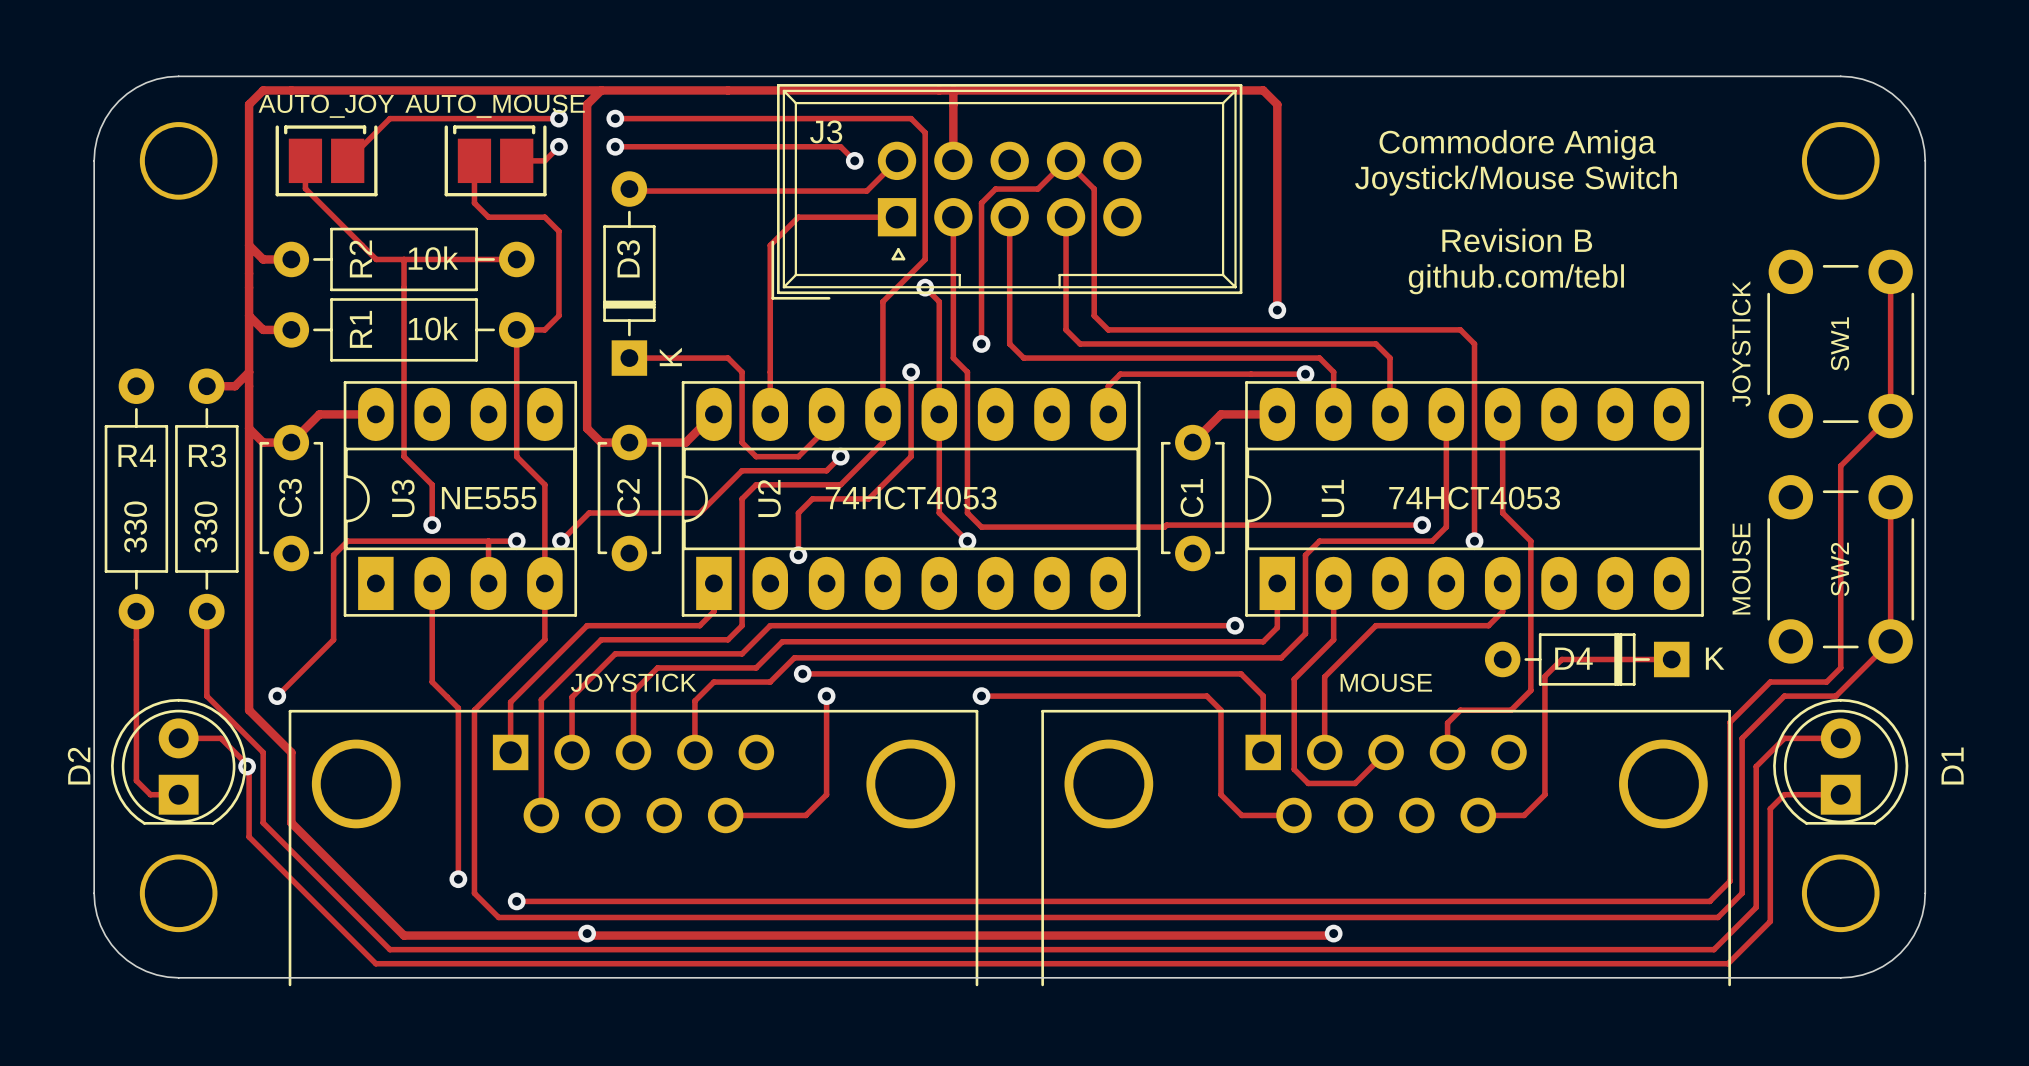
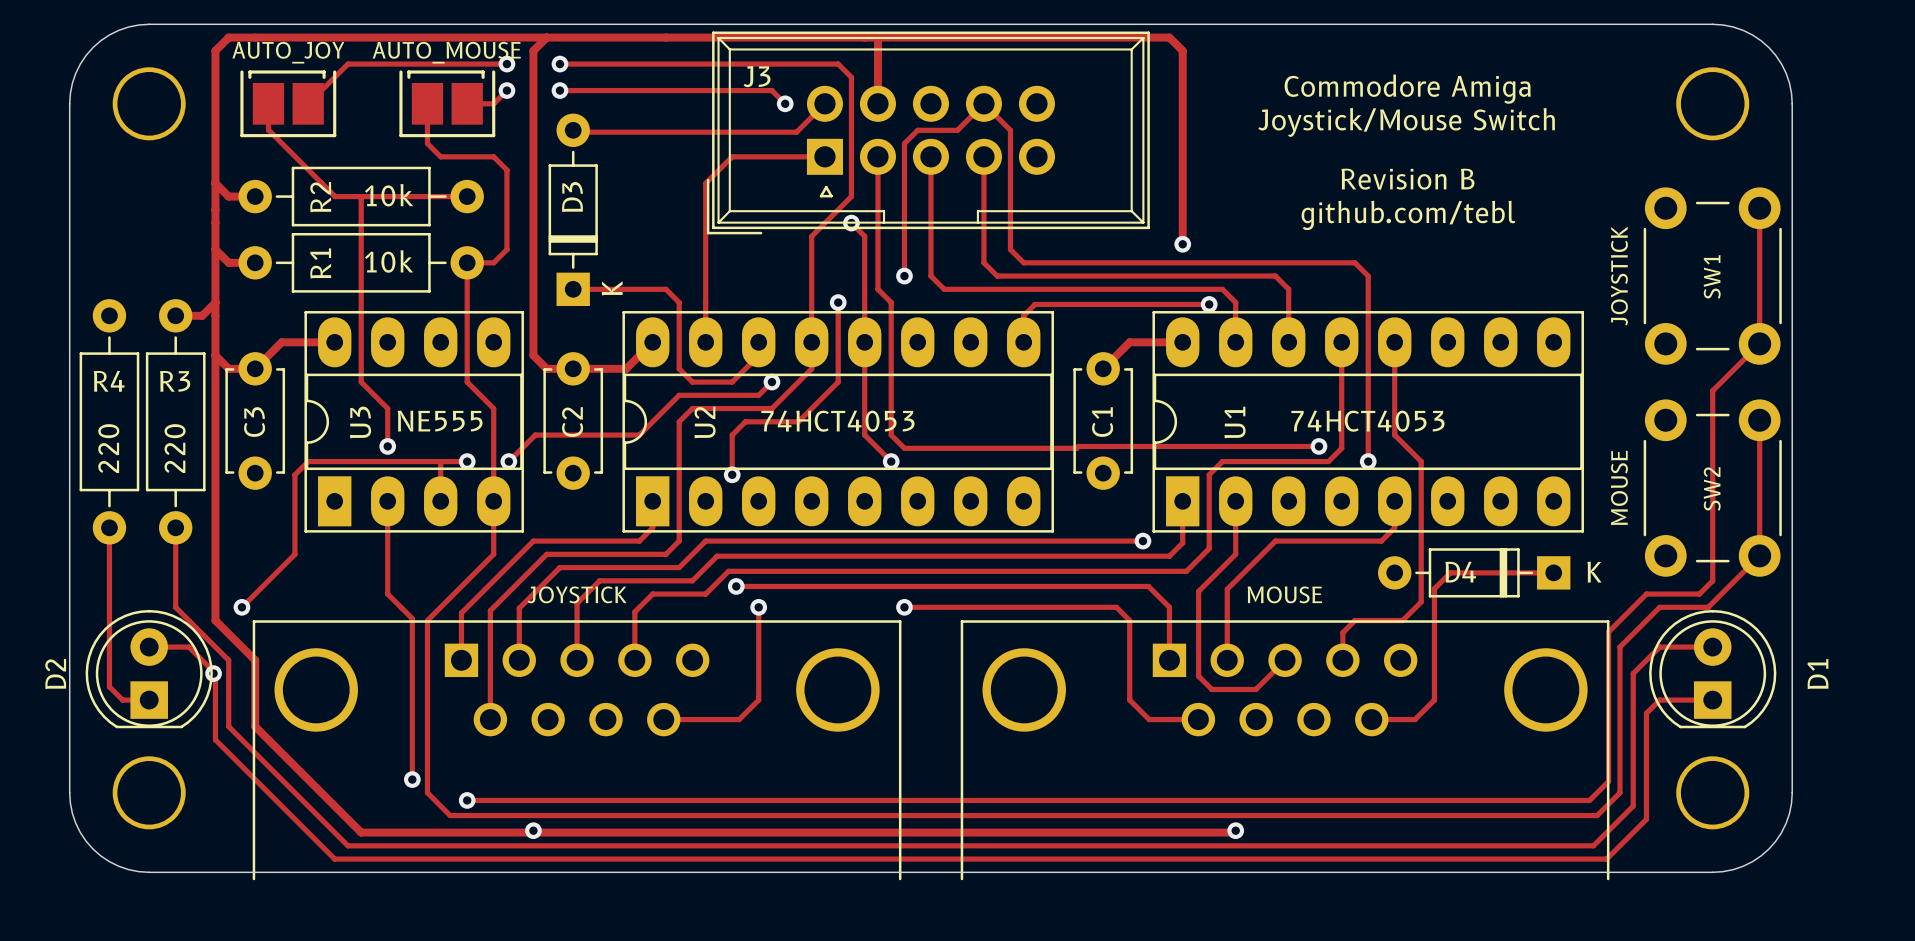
R4 value: 330 (135, 527) -> 220 (108, 448)
R3 value: 330 (206, 527) -> 220 (175, 448)

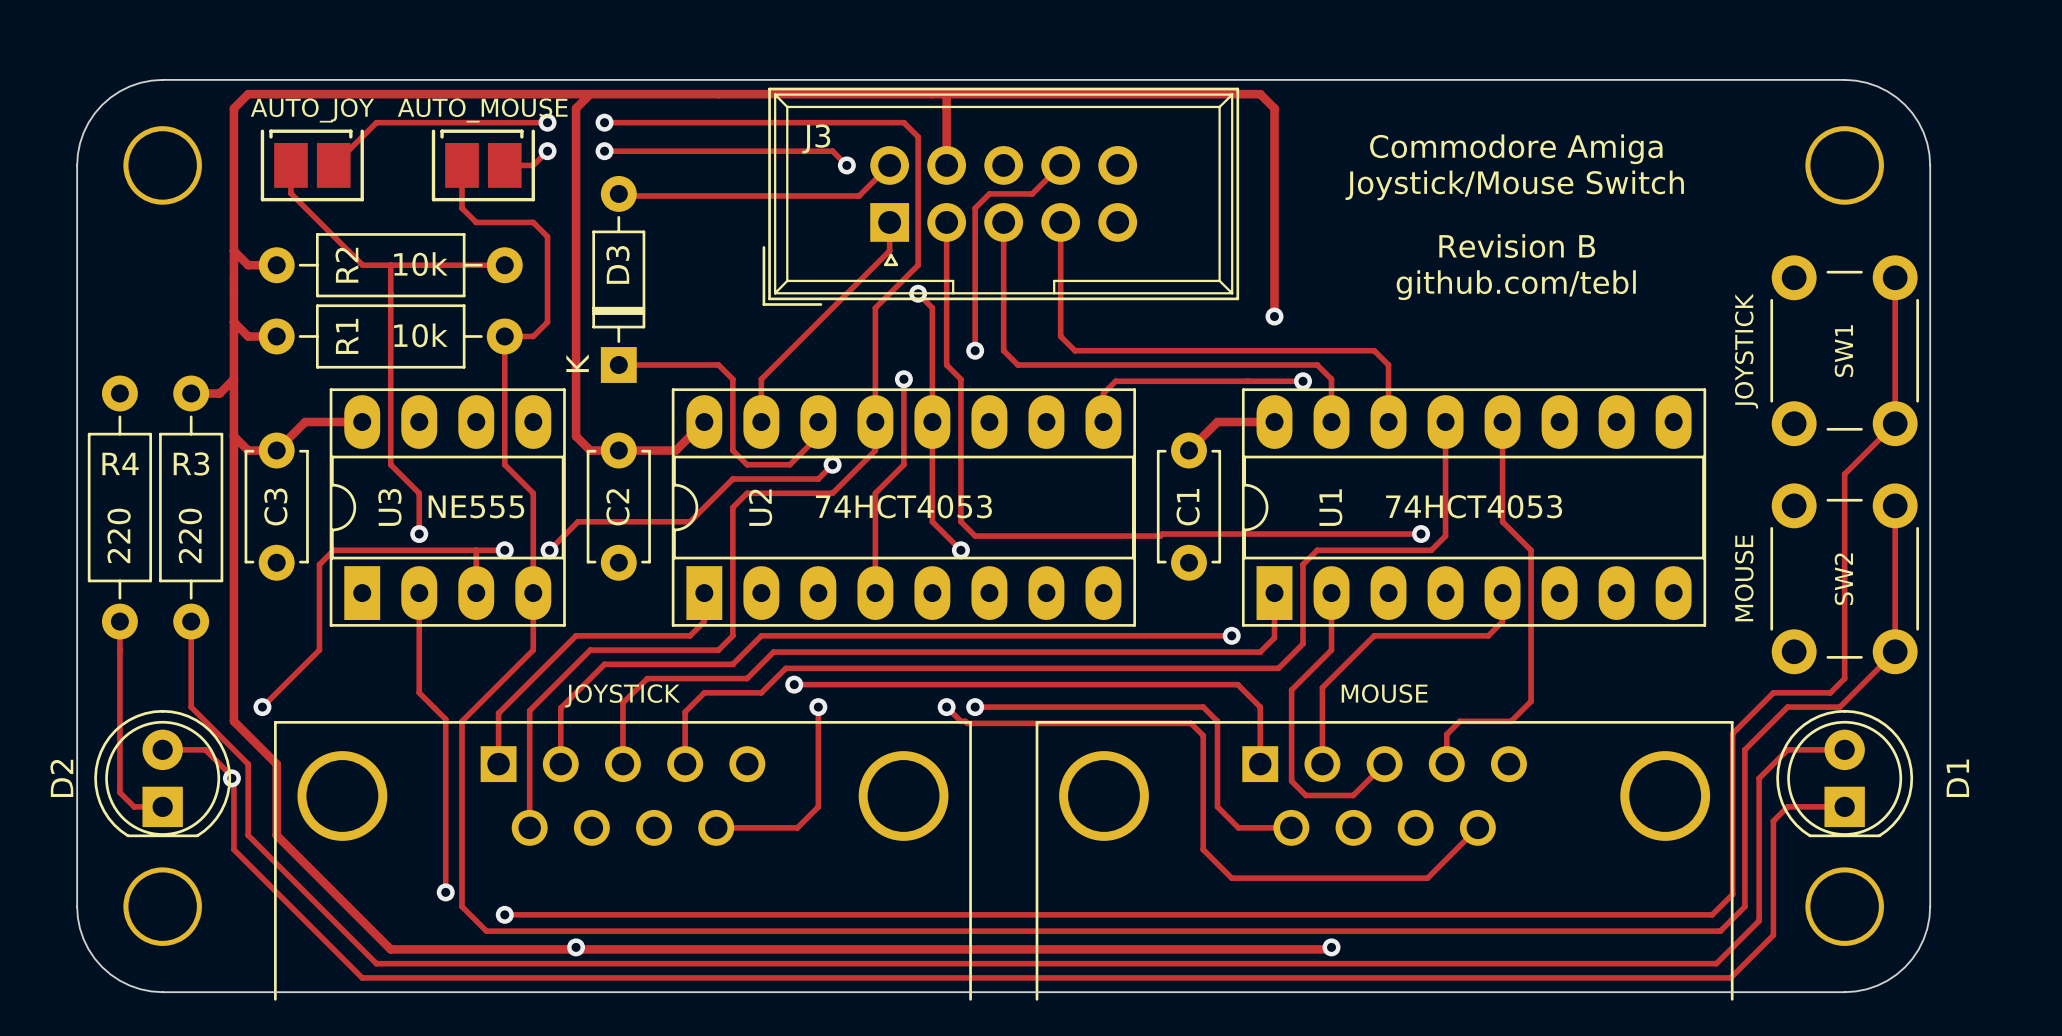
track: (983, 103) (1010, 130) (1010, 249) (1023, 262) (1354, 262) (1368, 276) (1368, 461) -> none
track: (824, 156) (732, 156) (705, 183) (705, 302) -> (889, 222) (889, 250) (761, 379)
D3 text position: K (612, 288) -> K (577, 363)
track: (811, 408) (798, 421) (745, 421) (732, 435) (732, 474) -> (875, 493) (875, 593)
via: (1368, 461) -> none
via: (732, 474) -> none
D4: (1474, 572) -> none
track: (1553, 572) (1450, 572) (1434, 588) (1434, 700) (1414, 719) (1371, 719) -> (946, 707) (960, 721) (967, 723) (1190, 723) (1203, 735) (1203, 849) (1231, 878) (1427, 878) (1477, 827)
via: none -> (946, 707)

